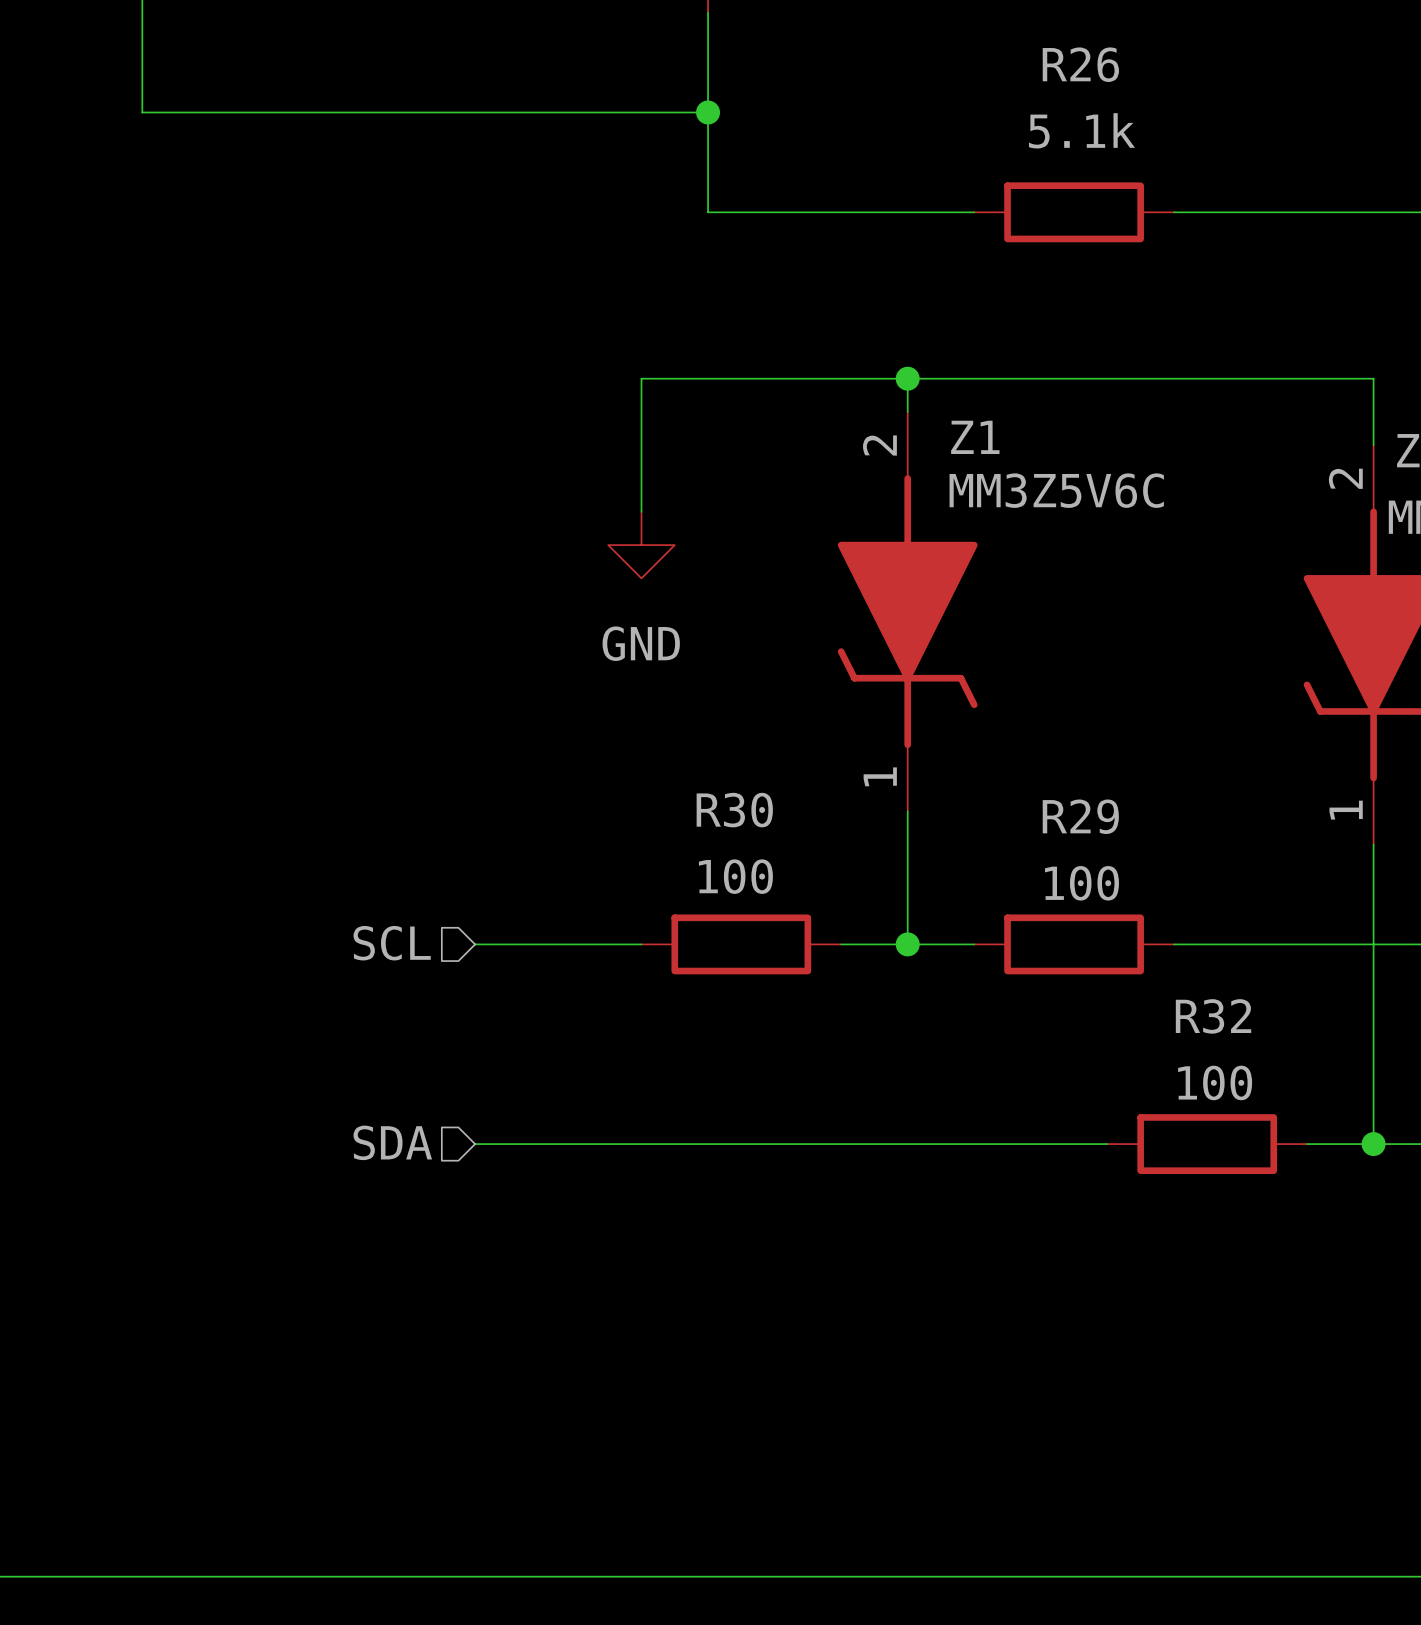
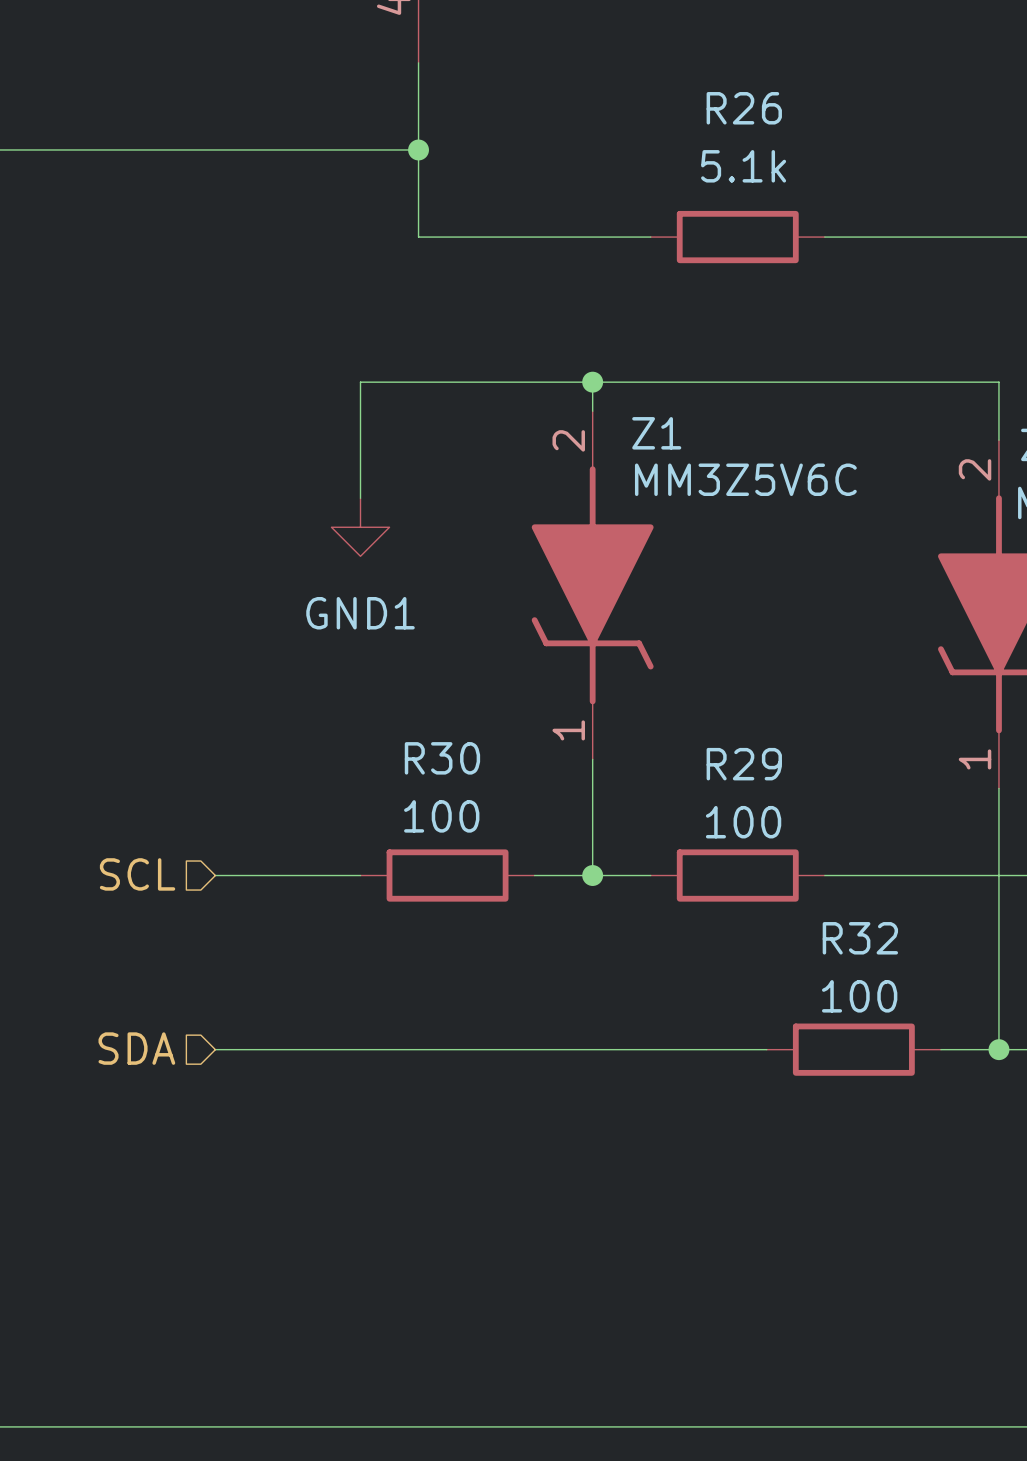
power symbol: GND (641, 545) -> GND1 (360, 527)

